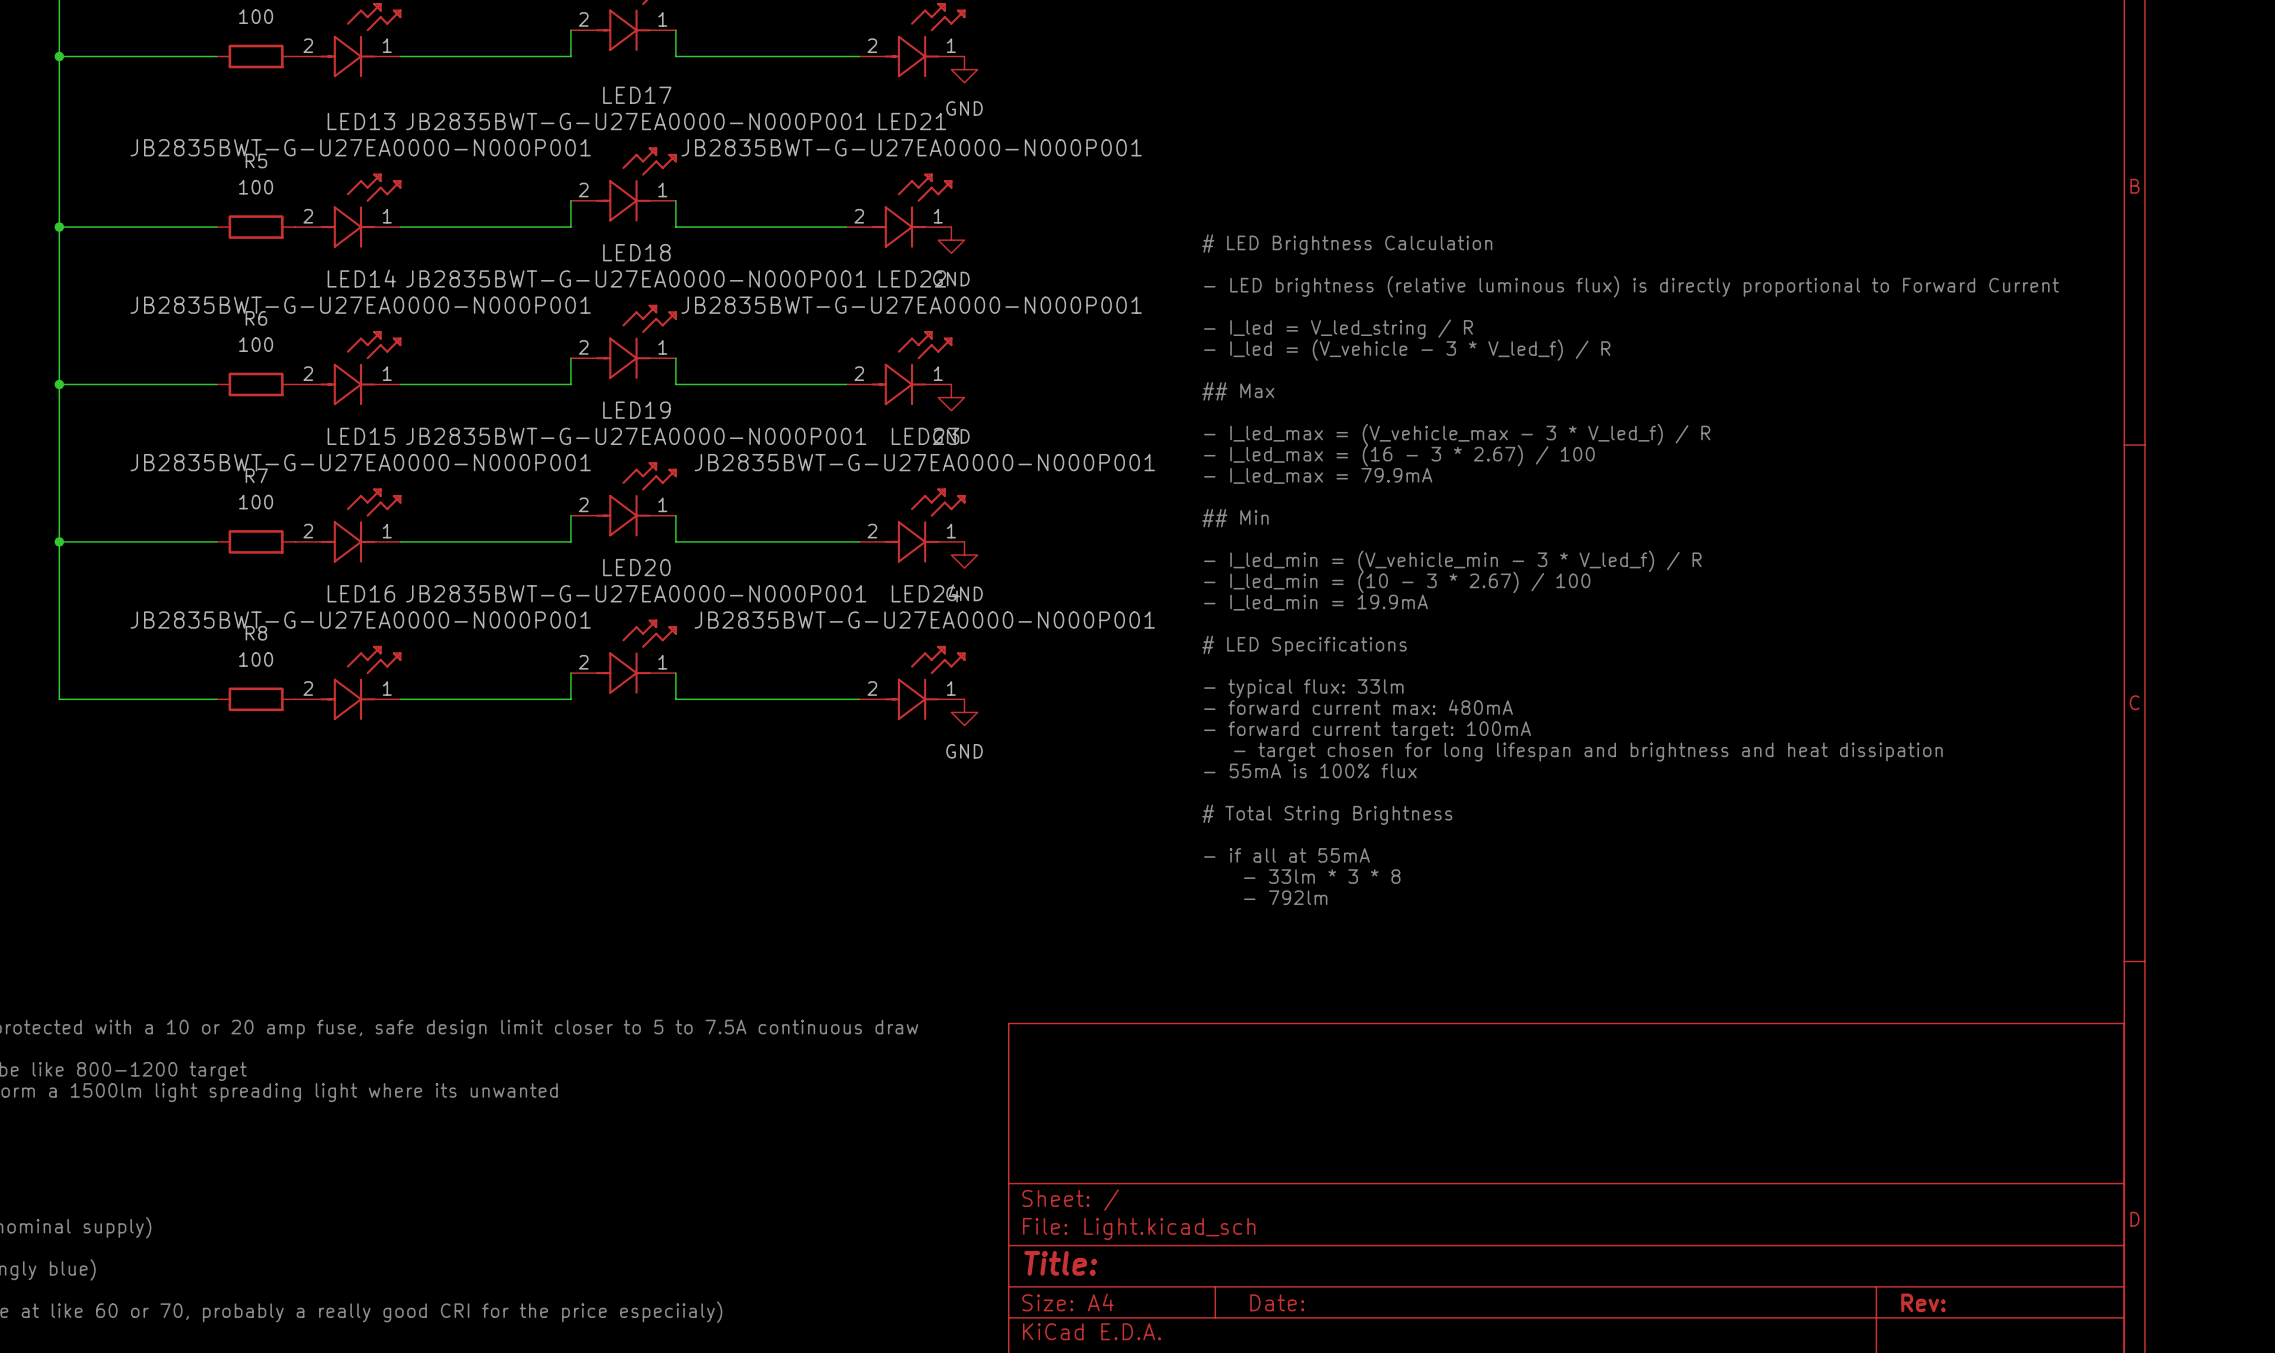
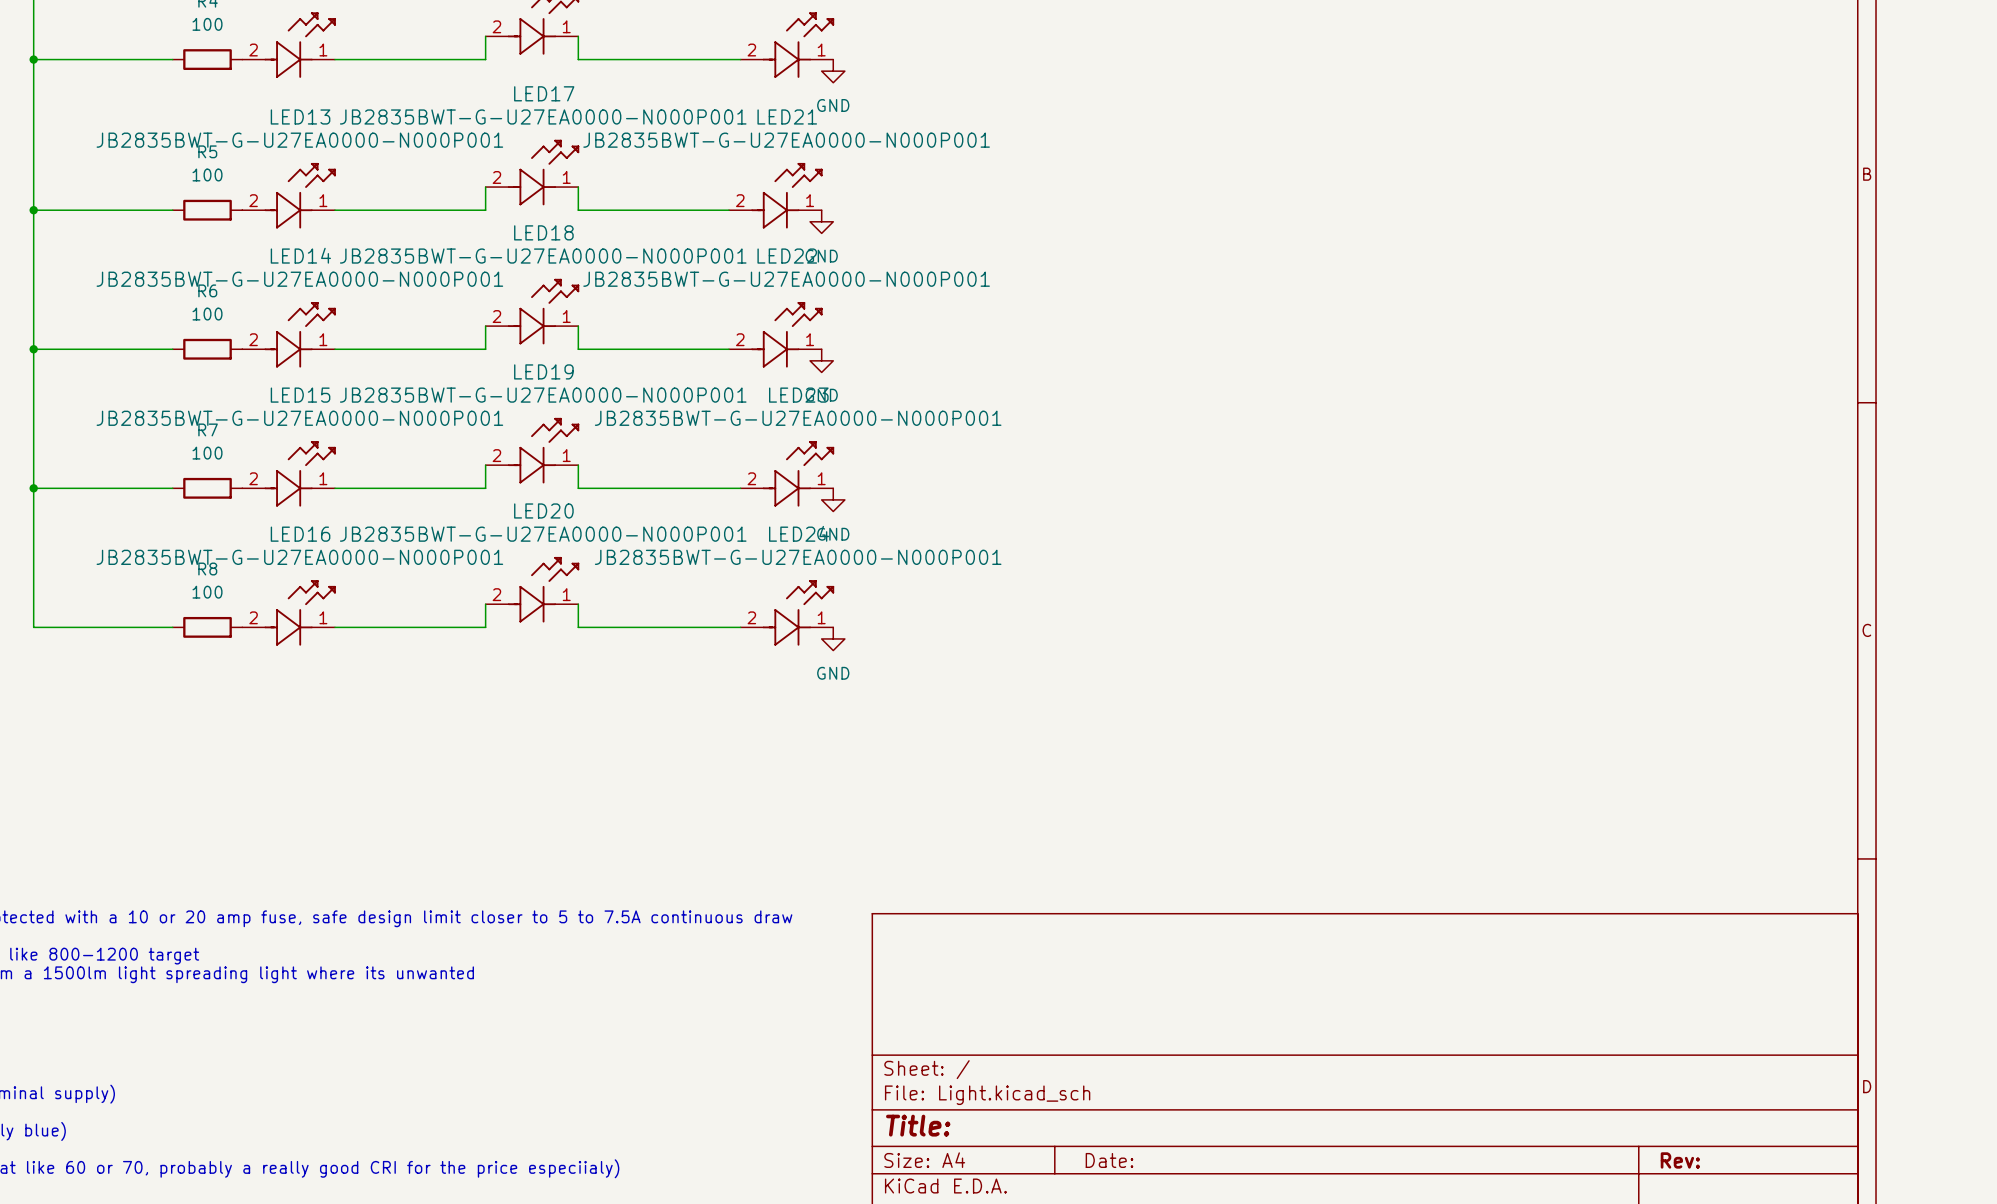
text: # LED Brightness Calculation (1347, 244) -> none
text: - LED brightness (relative luminous flux) is directly proportional to Forward Current (1631, 286) -> none
text: - I_led = V_led_string / R (1338, 329) -> none
text: - I_led = (V_vehicle - 3 * V_led_f) / R (1407, 350) -> none
text: ## Max (1238, 391) -> none
text: - I_led_max = (V_vehicle_max - 3 * V_led_f) / R (1457, 434) -> none
text: - I_led_max = (16 - 3 * 2.67) / 100 (1399, 455) -> none
text: - I_led_max = 79.9mA (1318, 475) -> none
text: ## Min (1235, 518) -> none
text: - I_led_min = (V_vehicle_min - 3 * V_led_f) / R (1452, 561) -> none
text: - I_led_min = (10 - 3 * 2.67) / 100 (1397, 582) -> none
text: - I_led_min = 19.9mA (1315, 602) -> none
text: # LED Specifications (1304, 645) -> none
text: - typical flux: 33lm (1303, 688) -> none
text: - forward current max: 480mA (1358, 707) -> none
text: - forward current target: 100mA (1367, 730) -> none
text: - target chosen for long lifespan and brightness and heat dissipation (1588, 752) -> none
text: - 55mA is 100% flux (1310, 770) -> none
text: # Total String Brightness (1327, 814) -> none
text: - if all at 55mA (1286, 855) -> none
text: - 33lm * 3 * 8 (1322, 876) -> none
text: - 792lm (1285, 897) -> none

